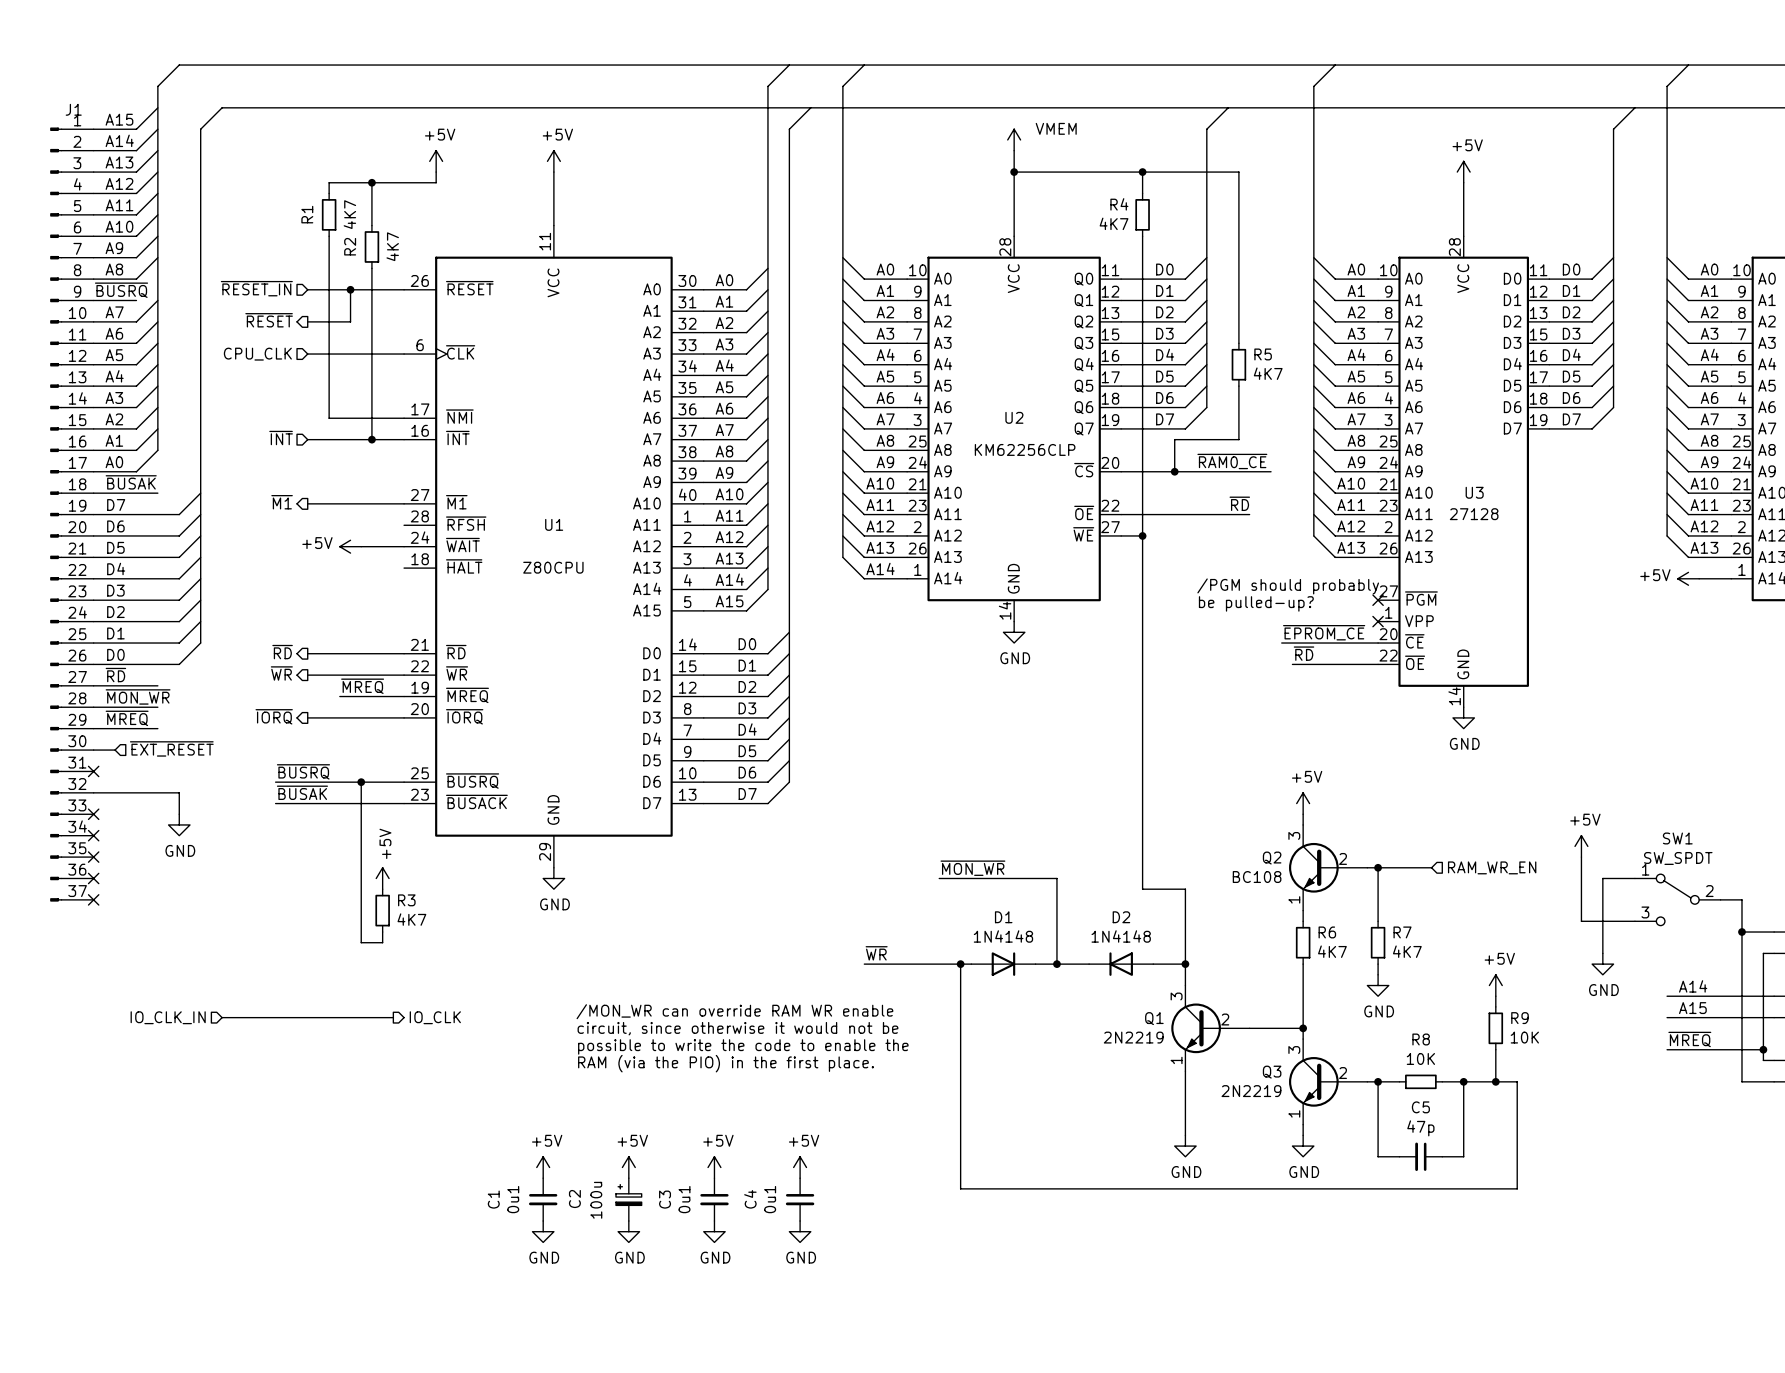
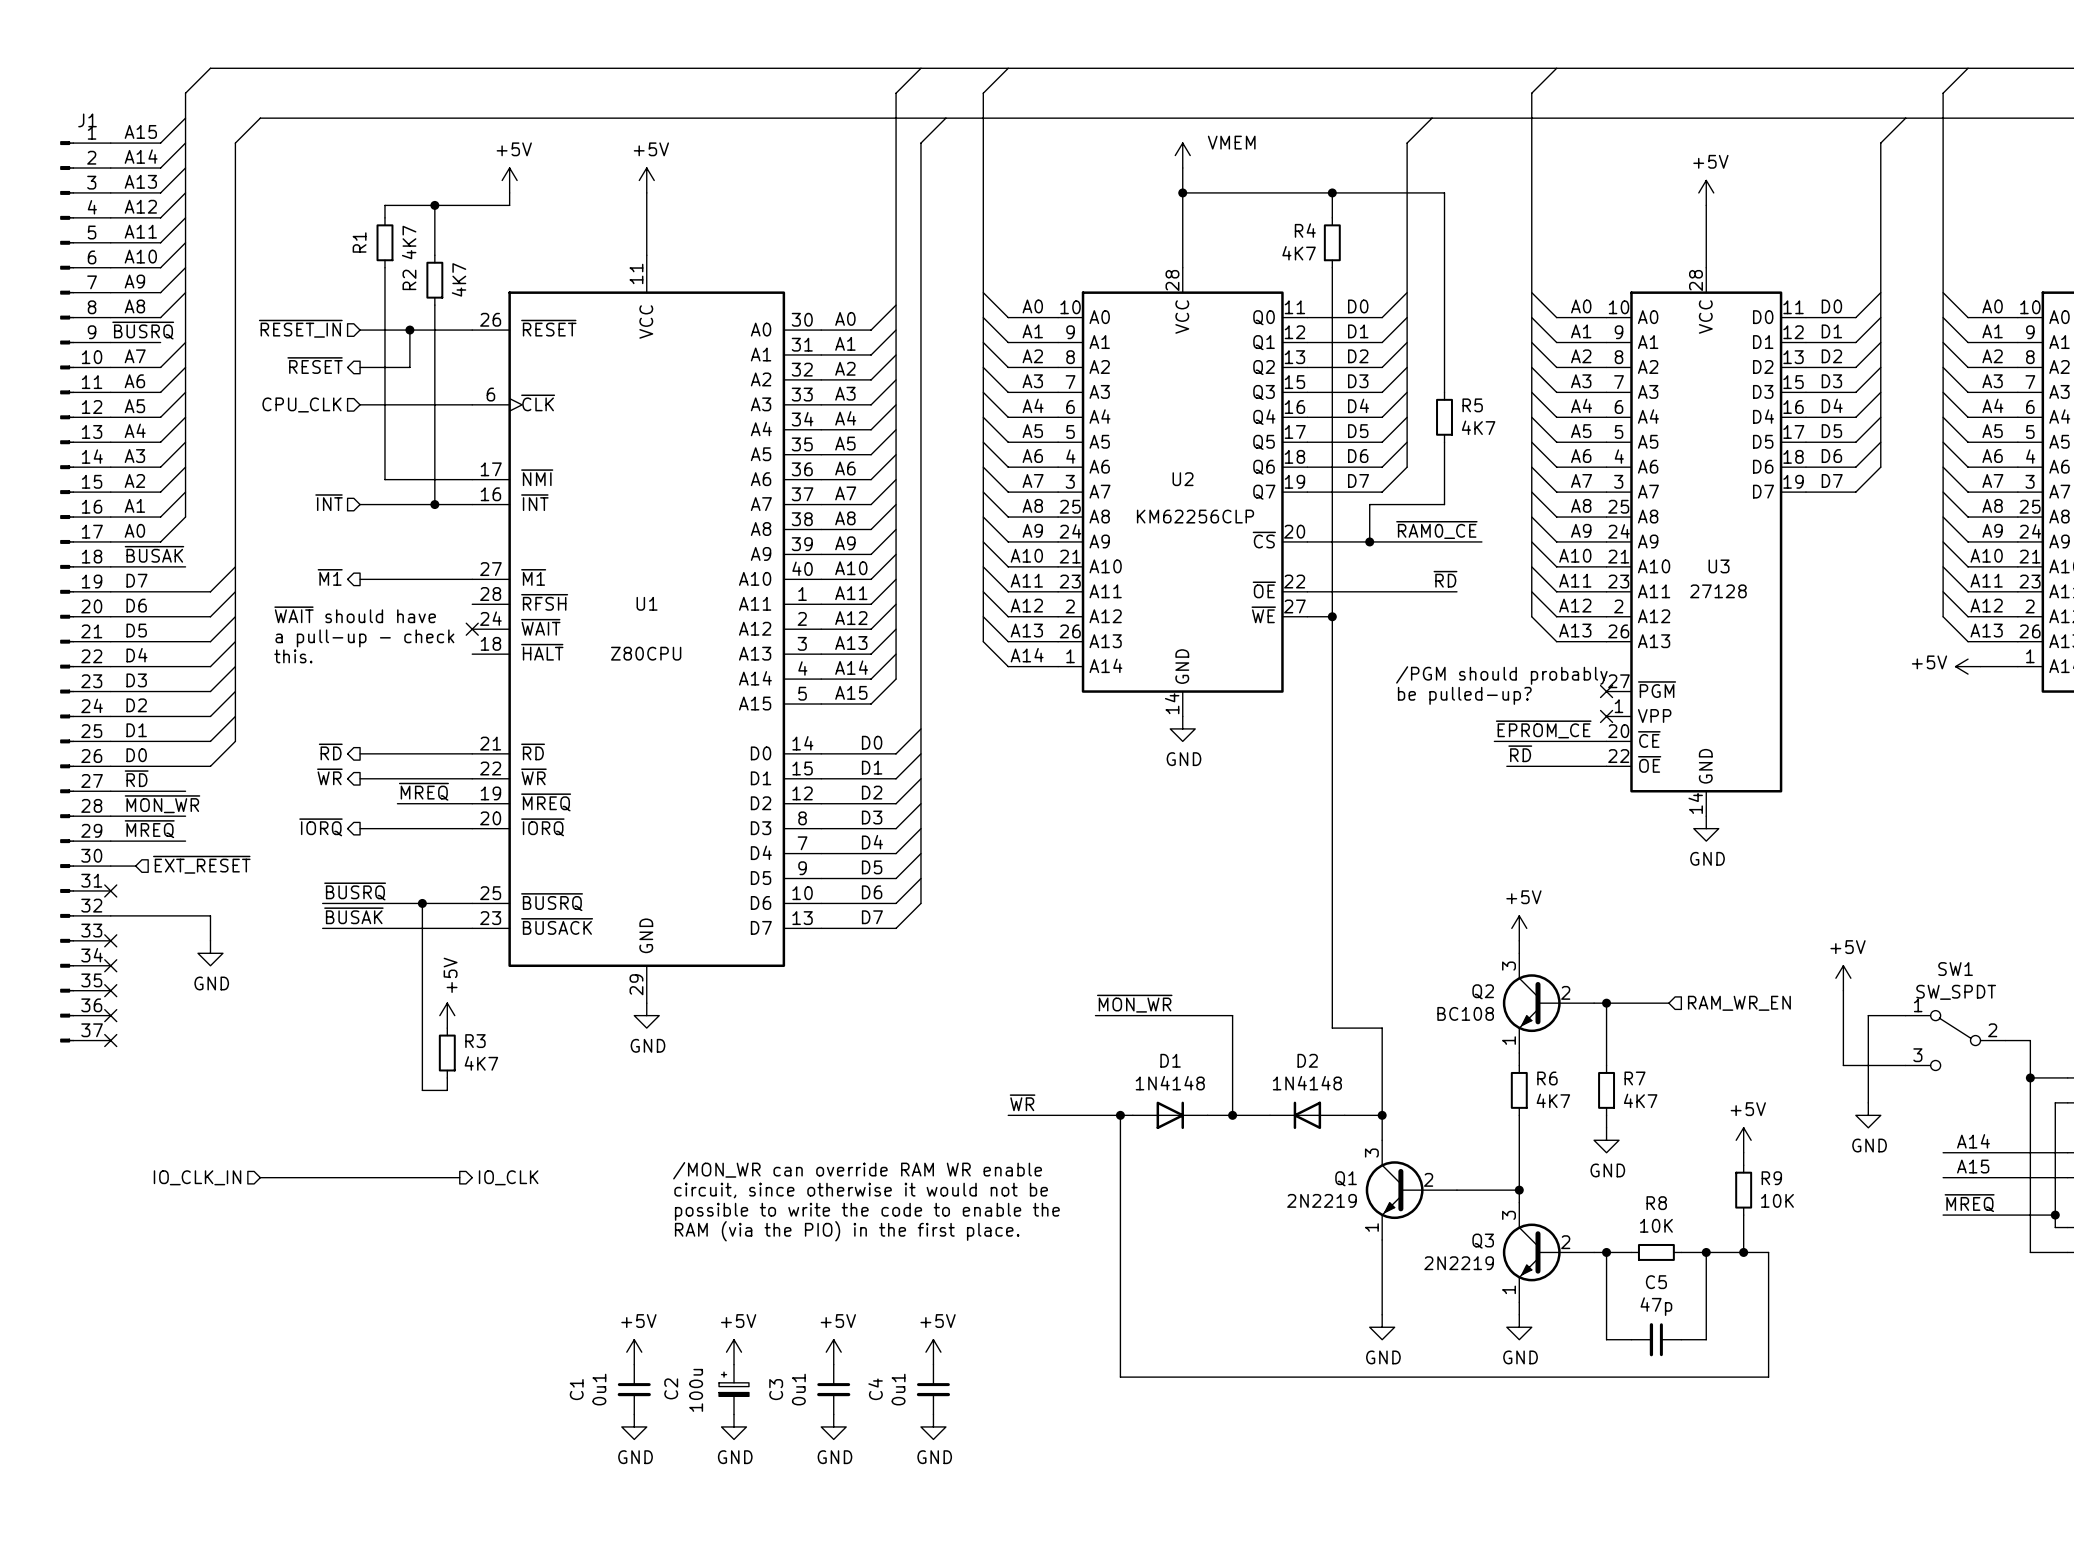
text: none -> ~{WAIT} should have (355, 614)
power symbol: +5V (350, 546) -> none
wire: (361, 546) (404, 546) -> none
no-connect mark: none -> (472, 629)
text: none -> a pull-up - check (364, 638)
text: none -> this. (293, 656)

